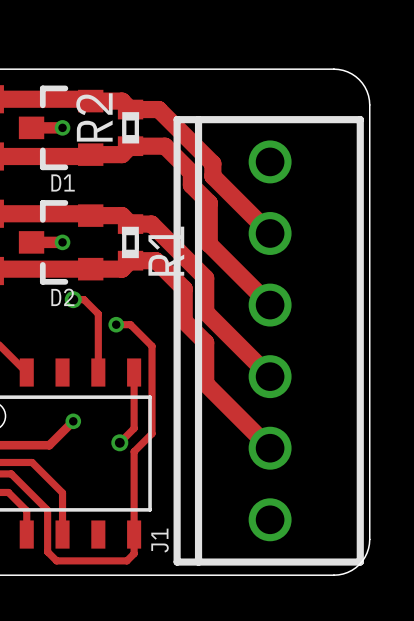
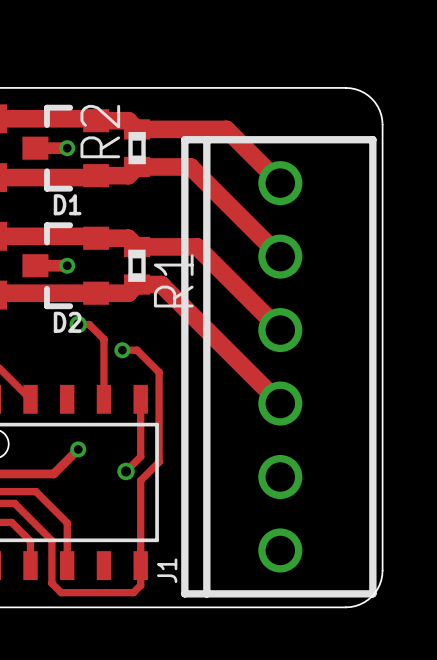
track: (158, 109) (212, 163) (212, 176) -> (172, 166) (190, 166) (221, 197)
track: none -> (165, 129) (226, 129) (280, 183)
track: (165, 146) (191, 172) (191, 185) (209, 203) (209, 244) -> (158, 246) (197, 246) (217, 267)
track: (151, 224) (205, 278) (205, 312) -> (161, 284) (214, 337)
track: (154, 260) (184, 288) (184, 321) (205, 342) (205, 383) (270, 448) -> none

